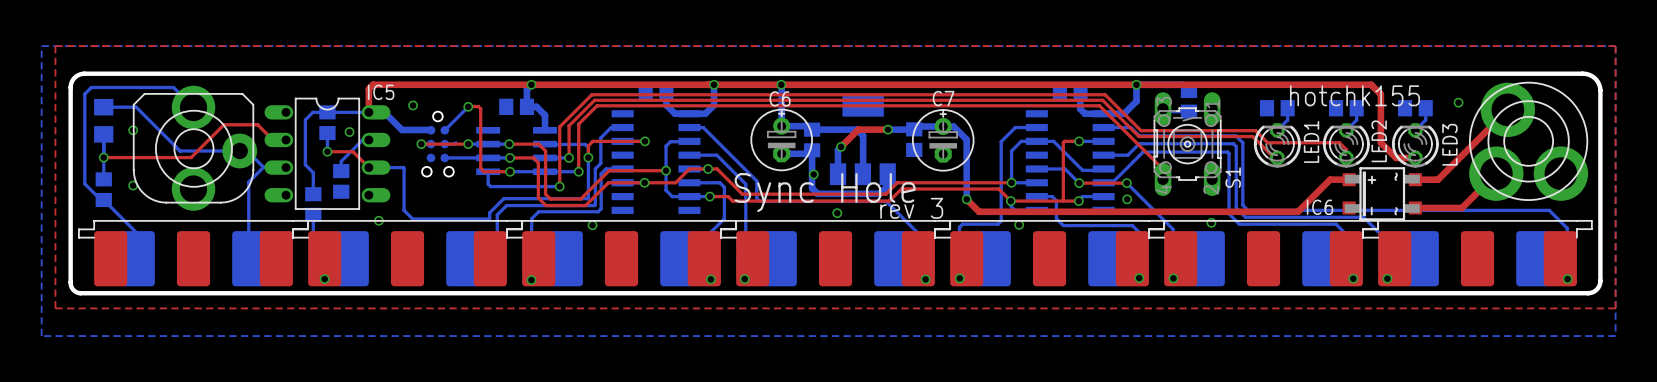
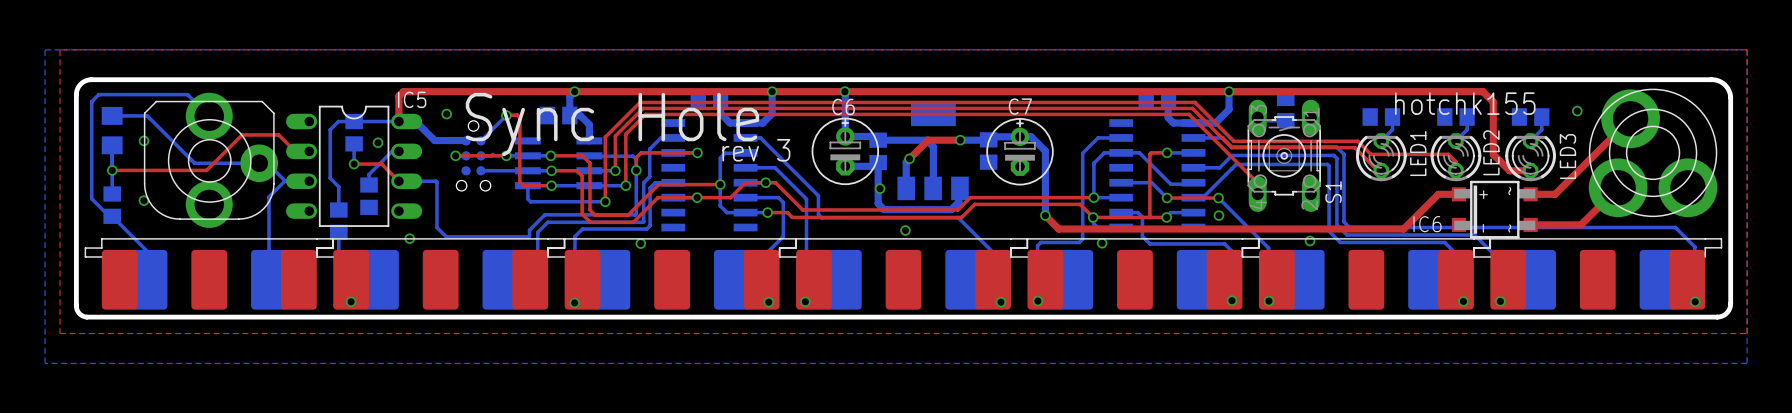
text: none -> Sync Hole (612, 124)
text: Sync Hole (825, 192) -> none
text position: rev 3 (911, 208) -> rev 3 (756, 150)

